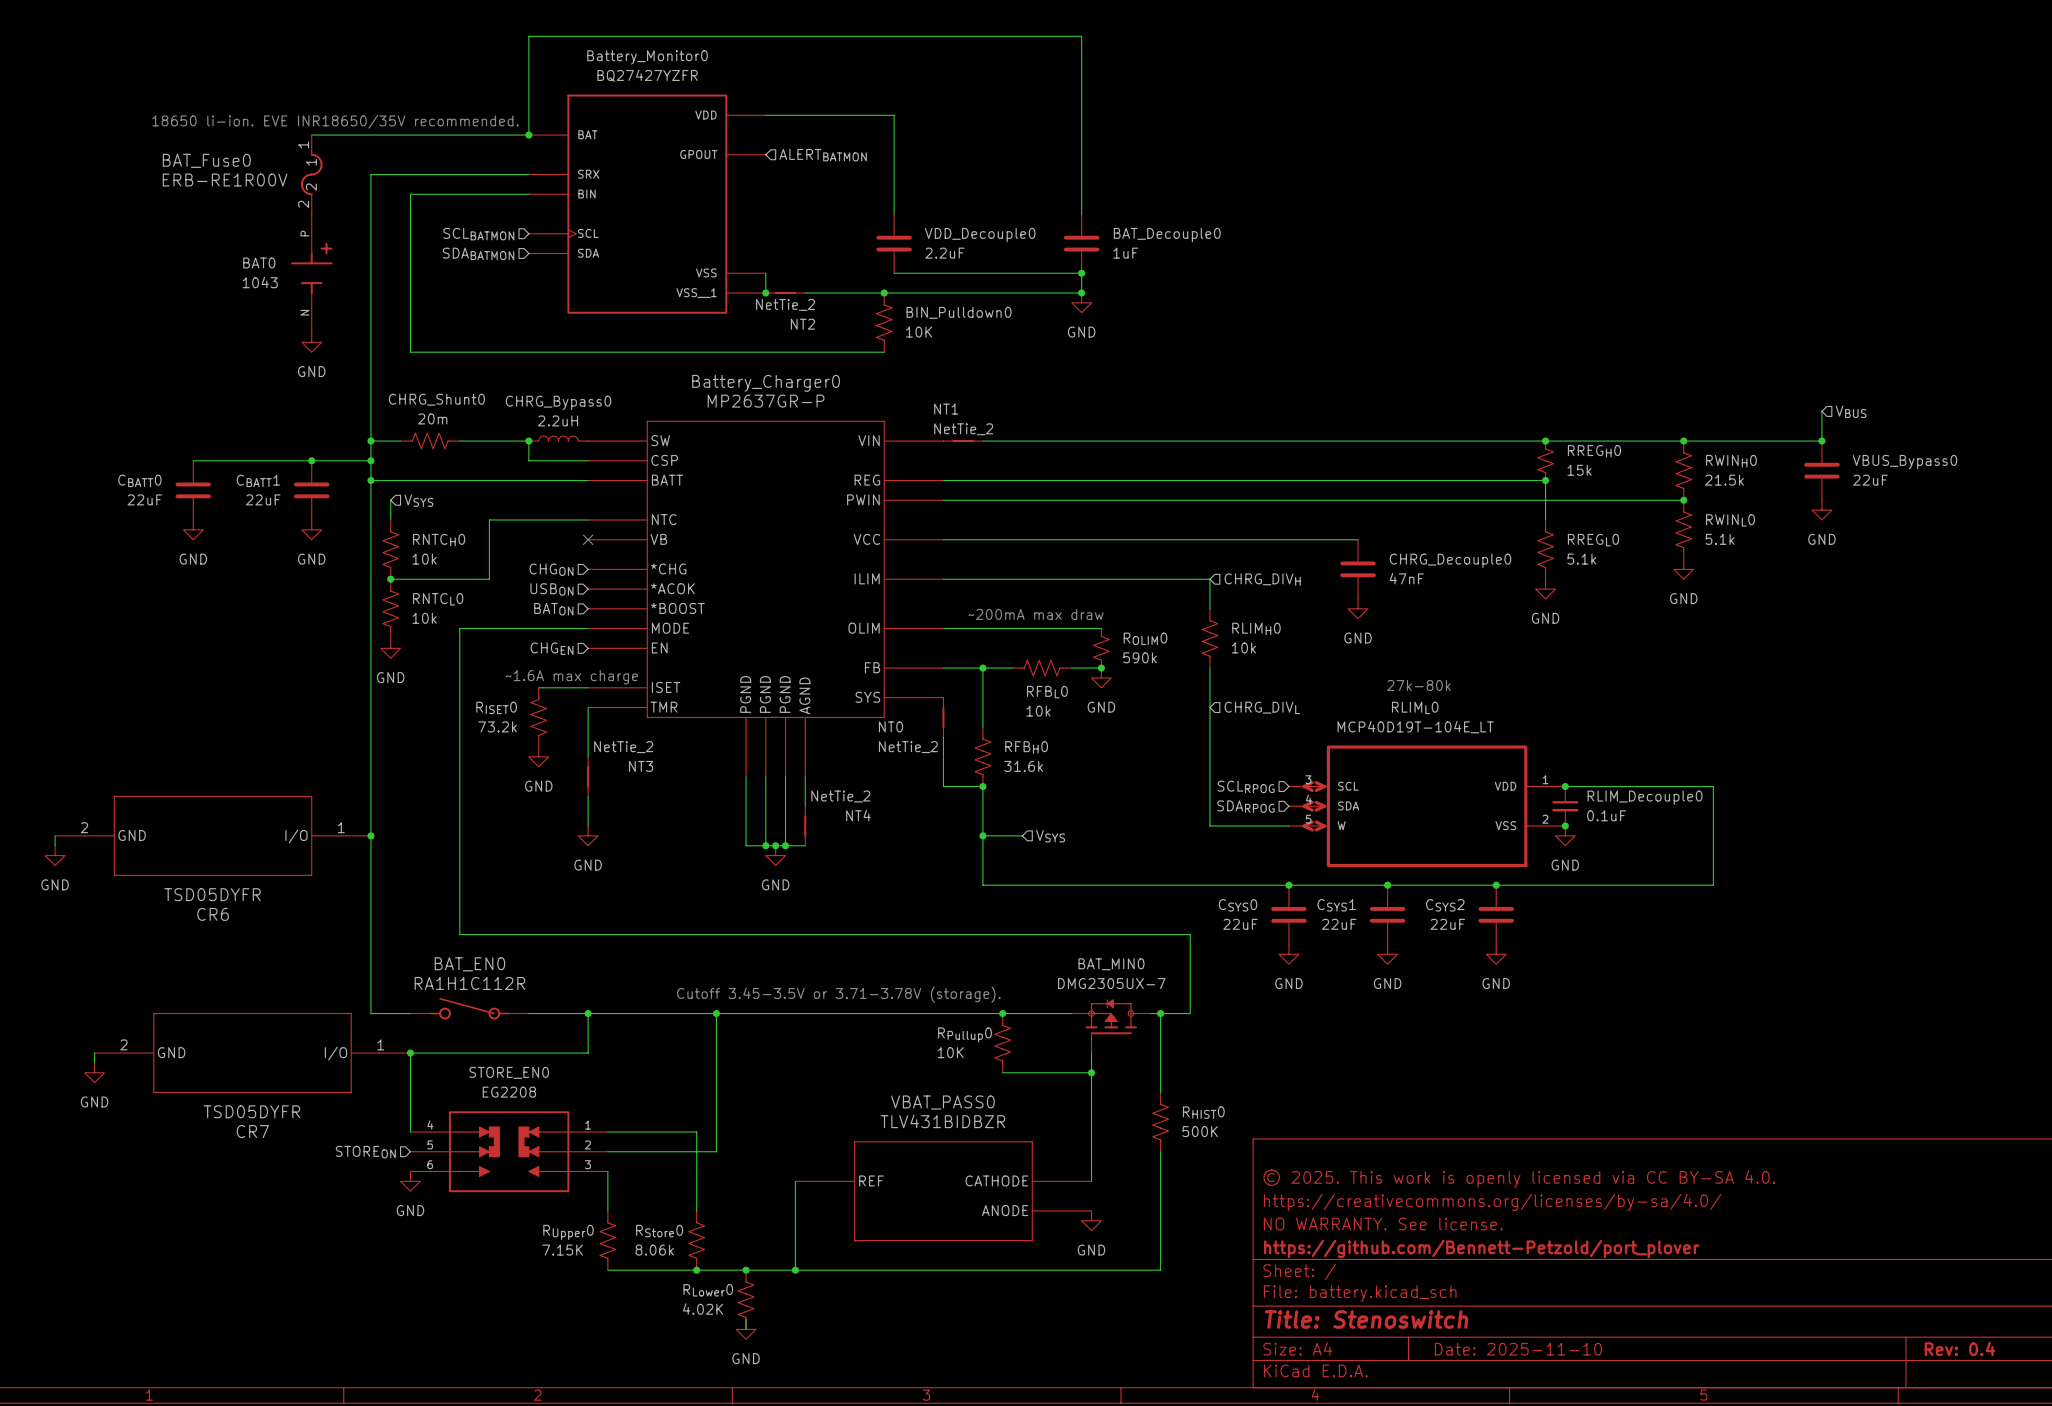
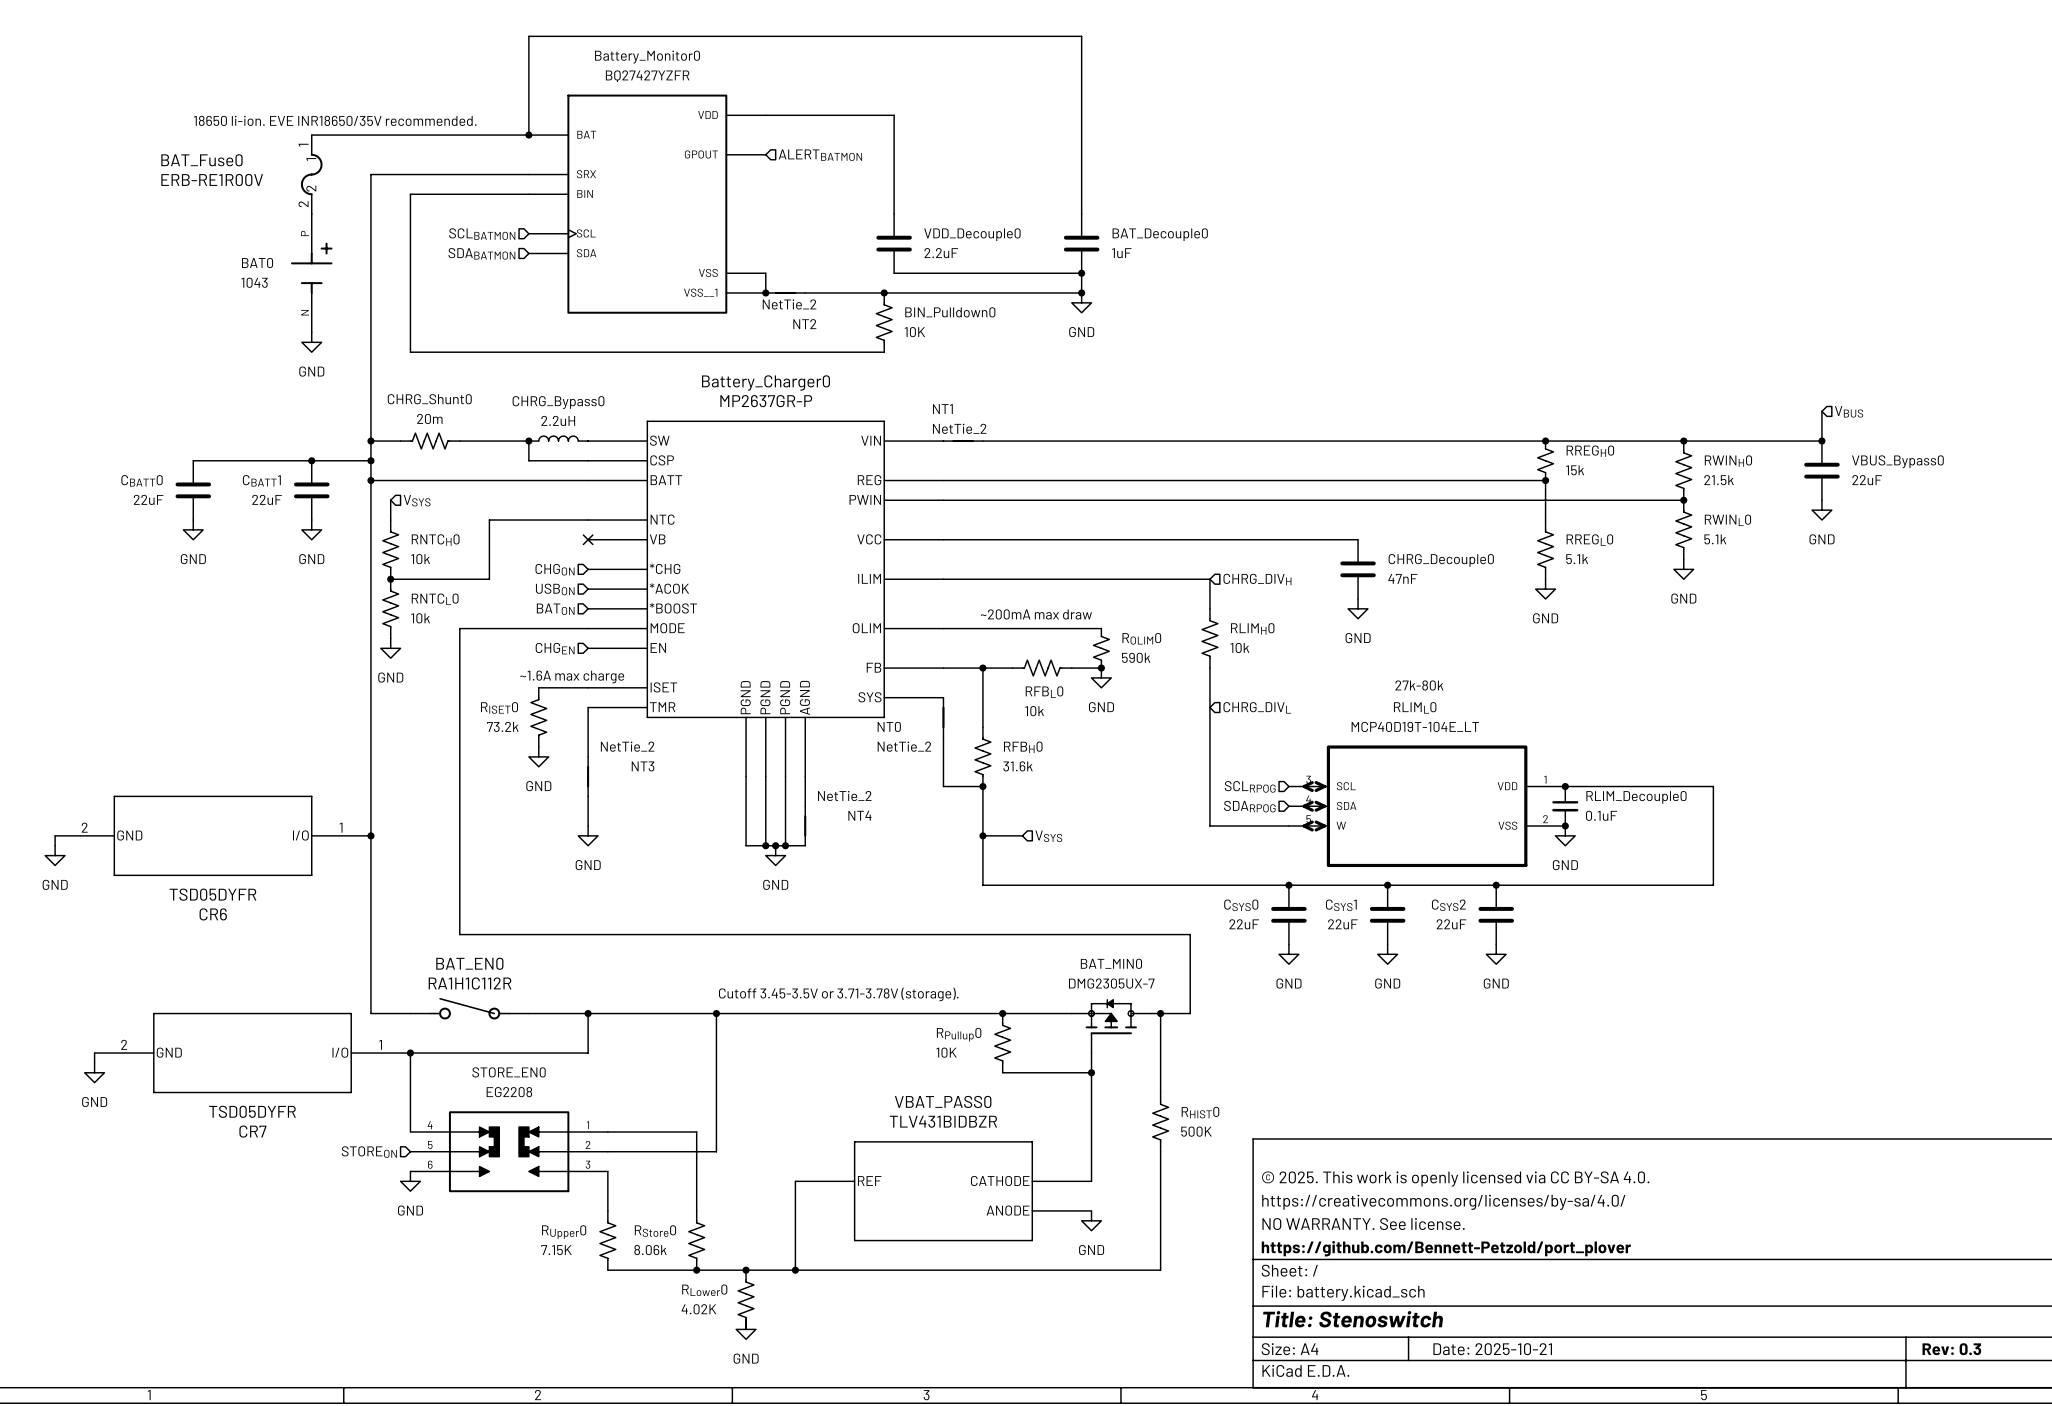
title block: Rev: 0.4 (1959, 1348) -> Rev: 0.3 (1951, 1349)
title block: Date: 2025-11-10 (1518, 1349) -> Date: 2025-10-21 (1492, 1349)

